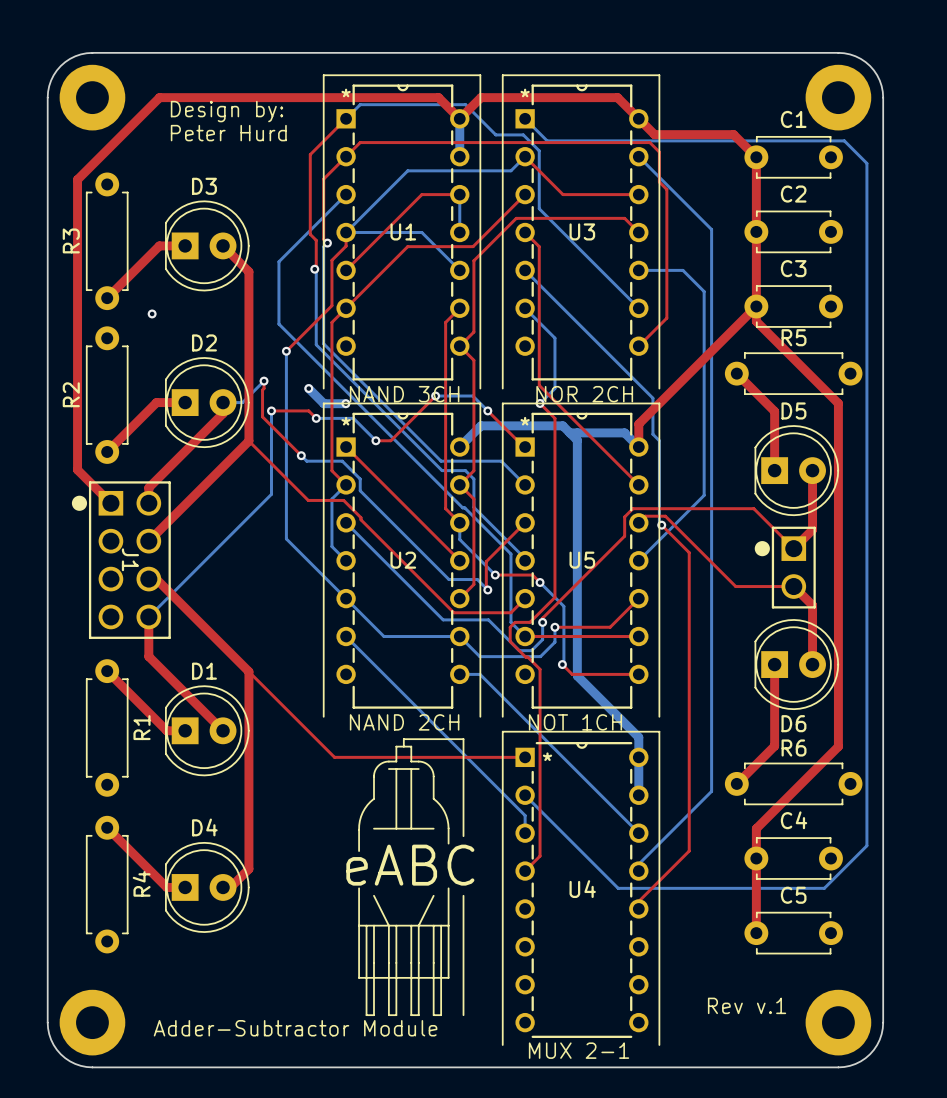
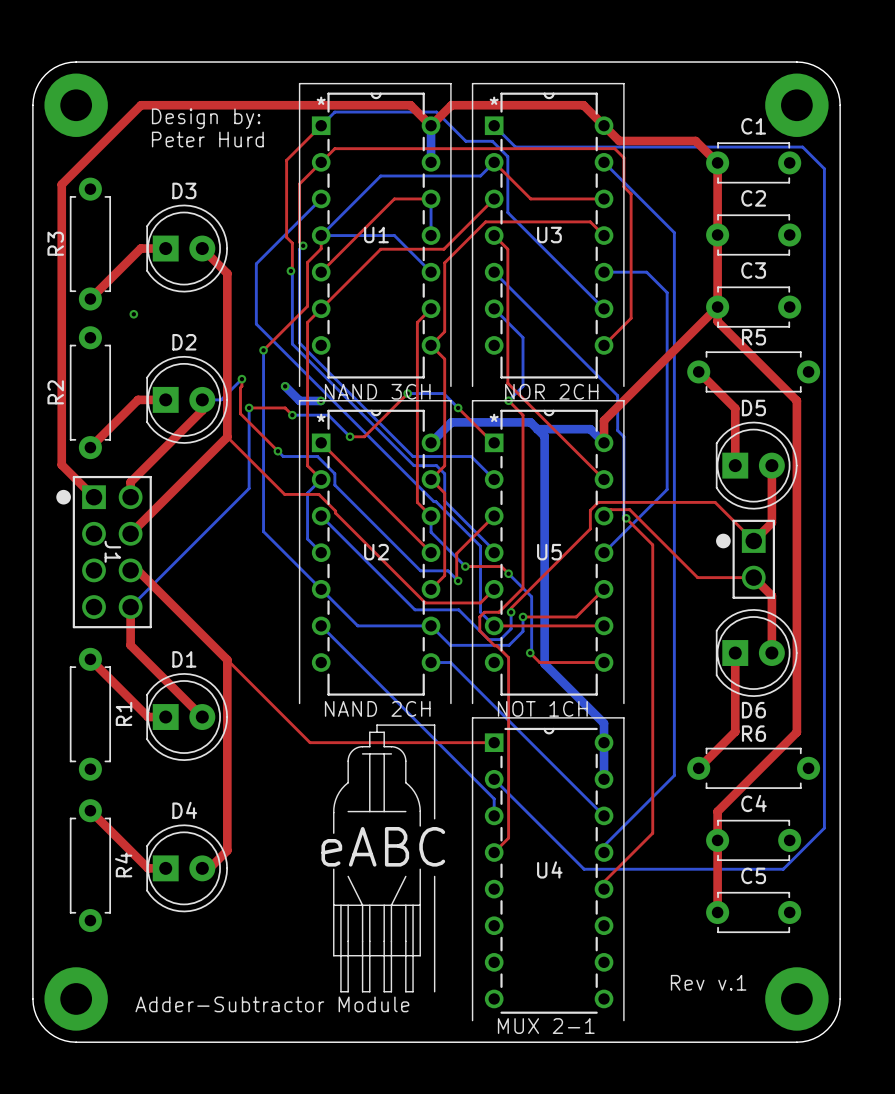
U4 text: * (547, 756) -> none

